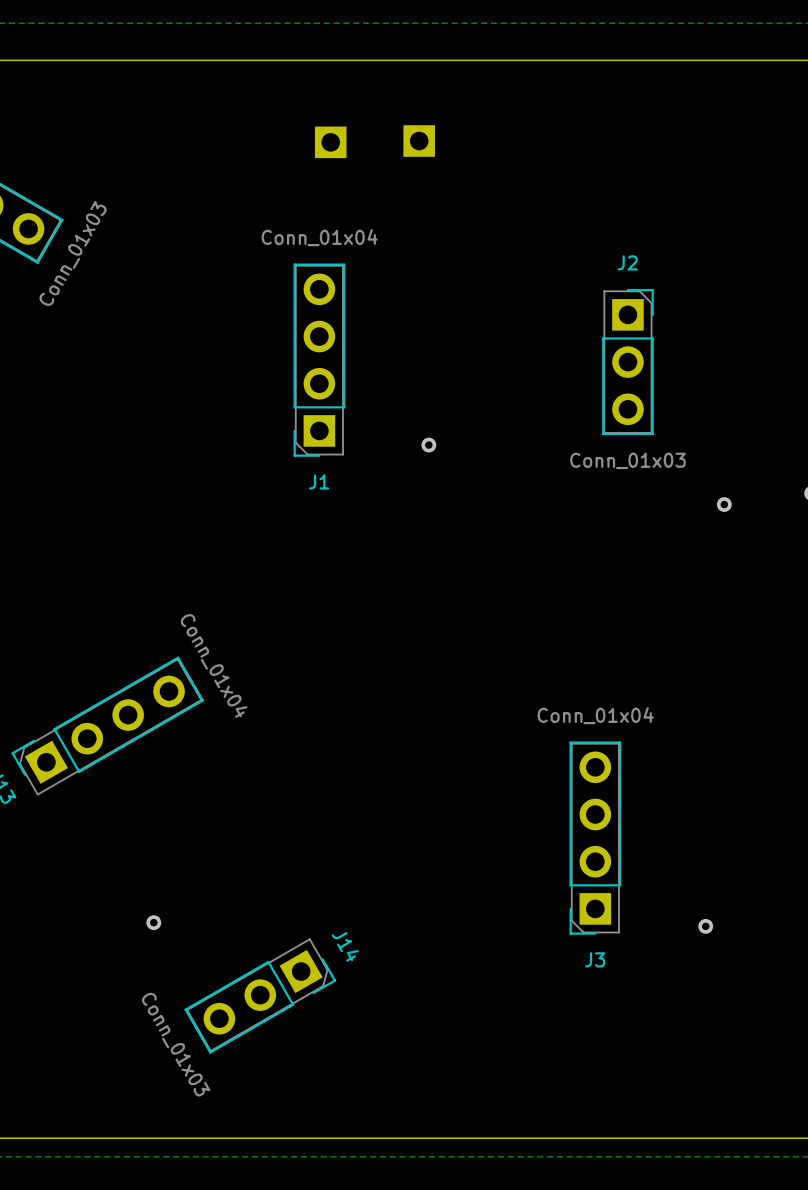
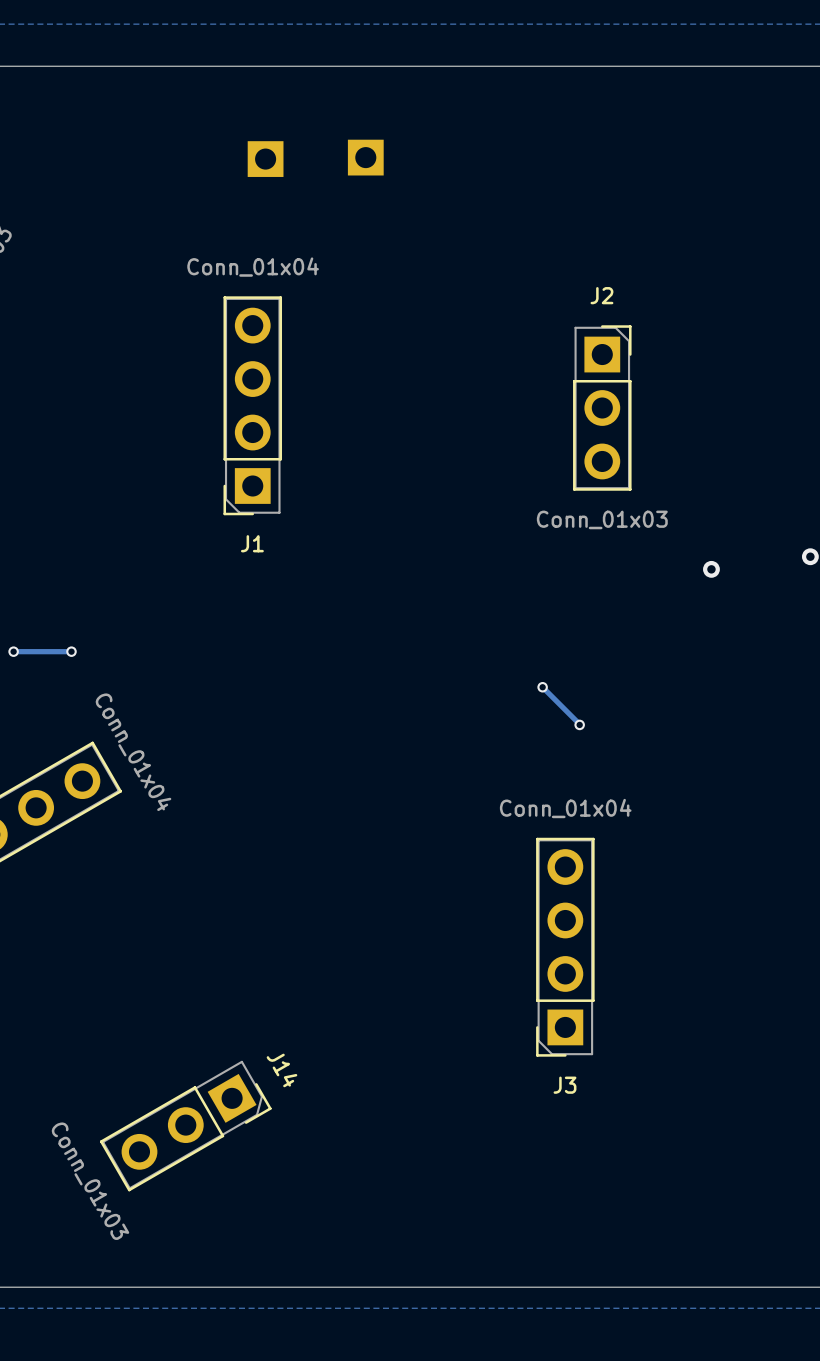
via: (428, 445) -> none
via: none -> (13, 651)
track: none -> (71, 651) (13, 651)
via: none -> (71, 651)
track: none -> (542, 687) (579, 724)
via: none -> (542, 687)
via: none -> (579, 724)
via: (153, 922) -> none
via: (705, 926) -> none

